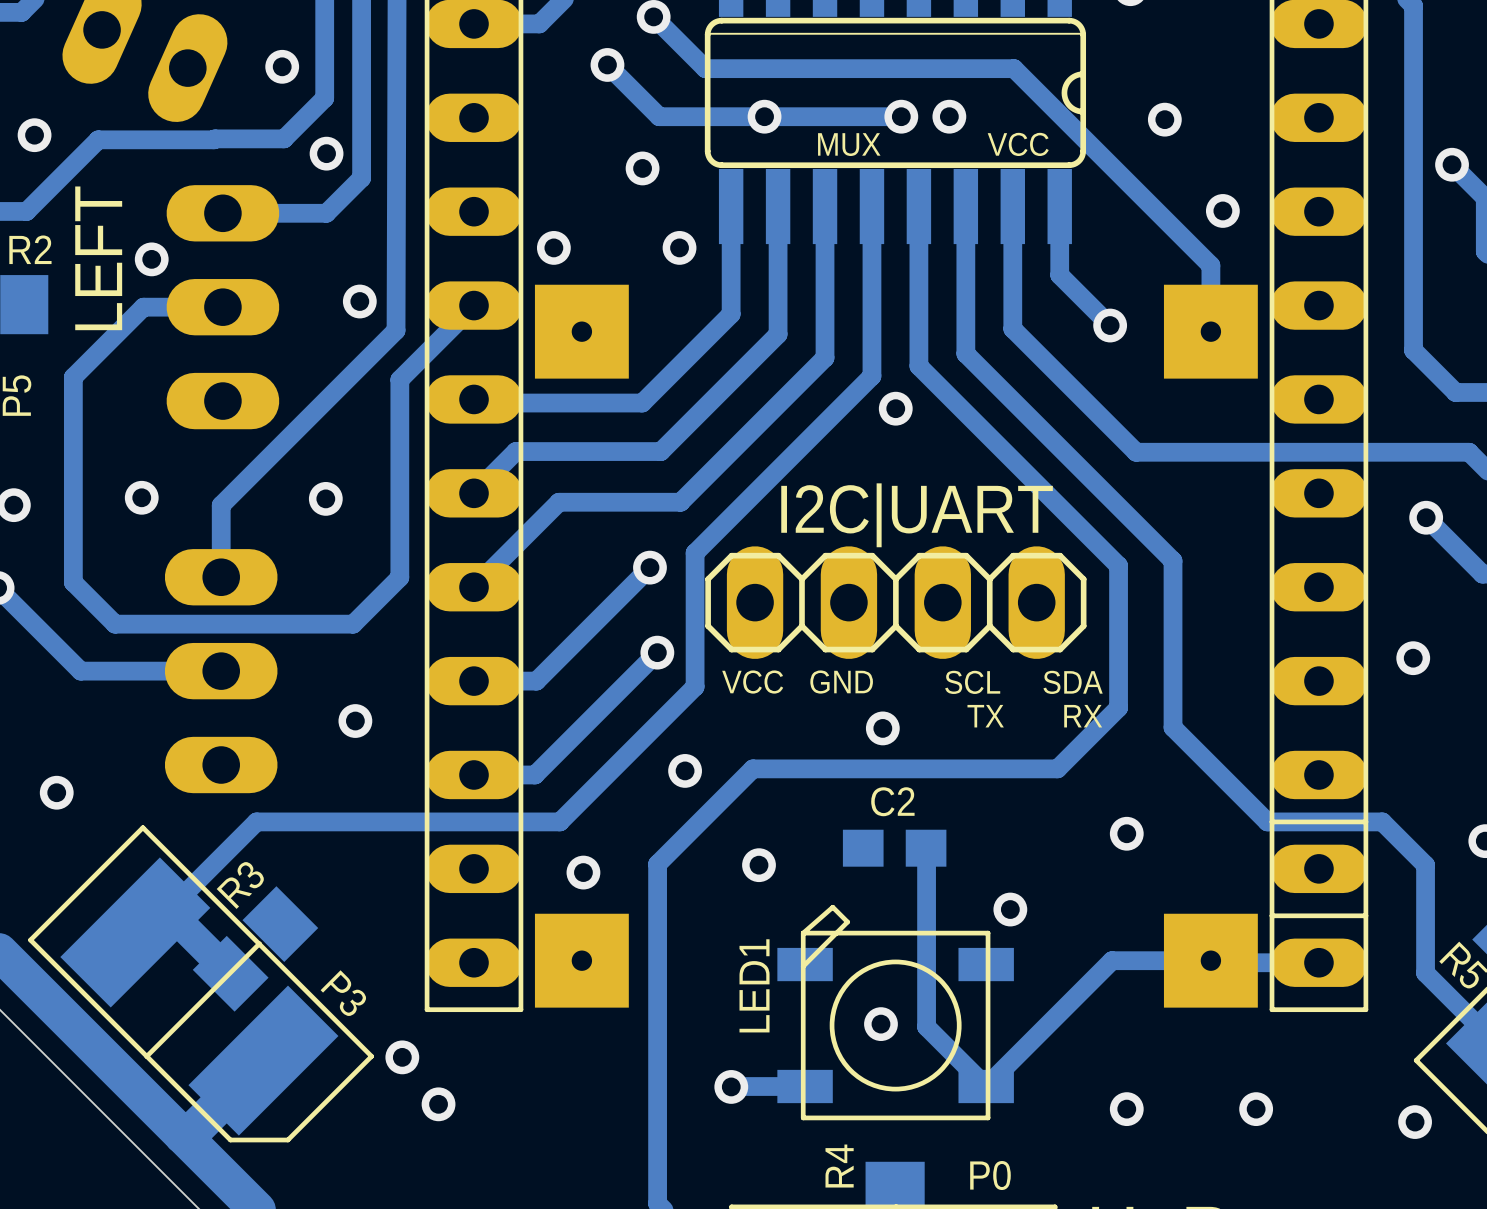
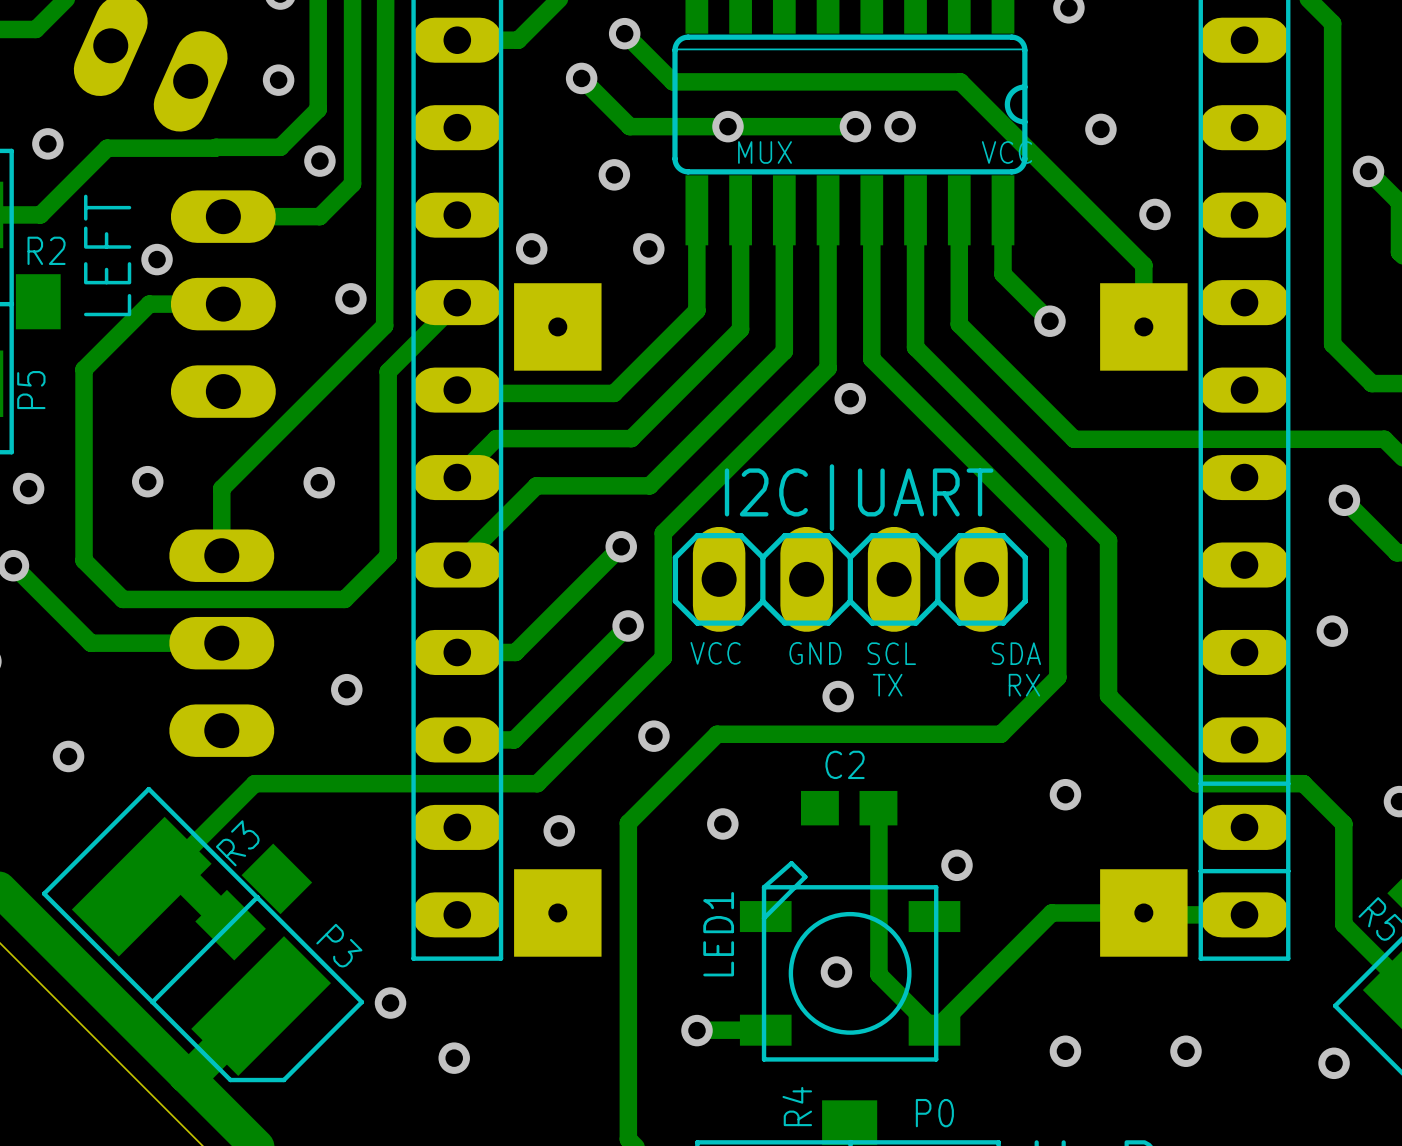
via position: (438, 1104) -> (454, 1058)

